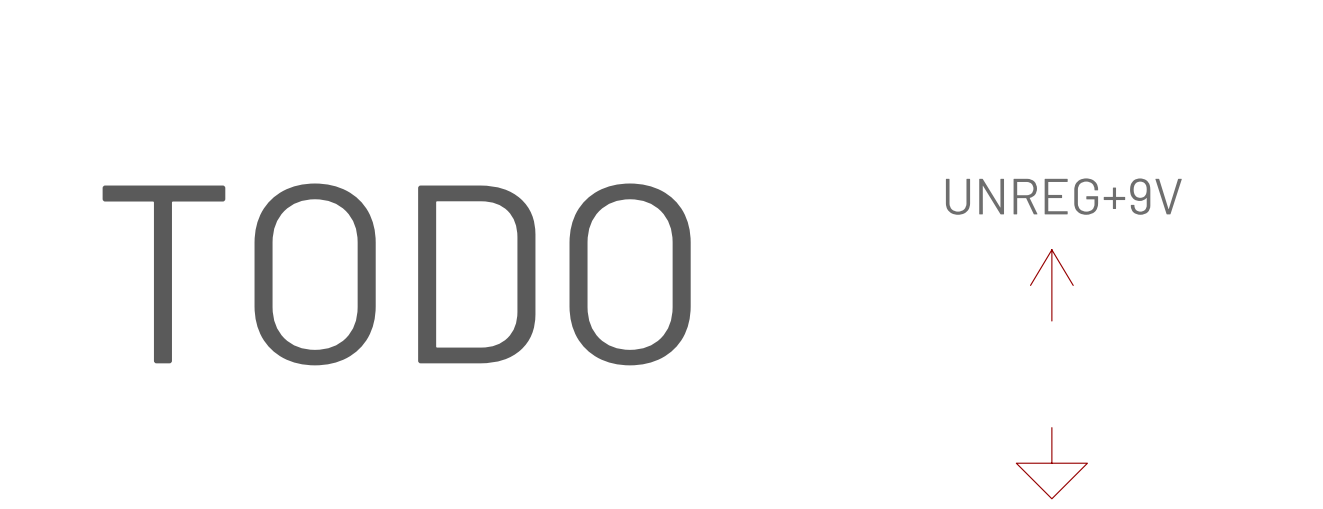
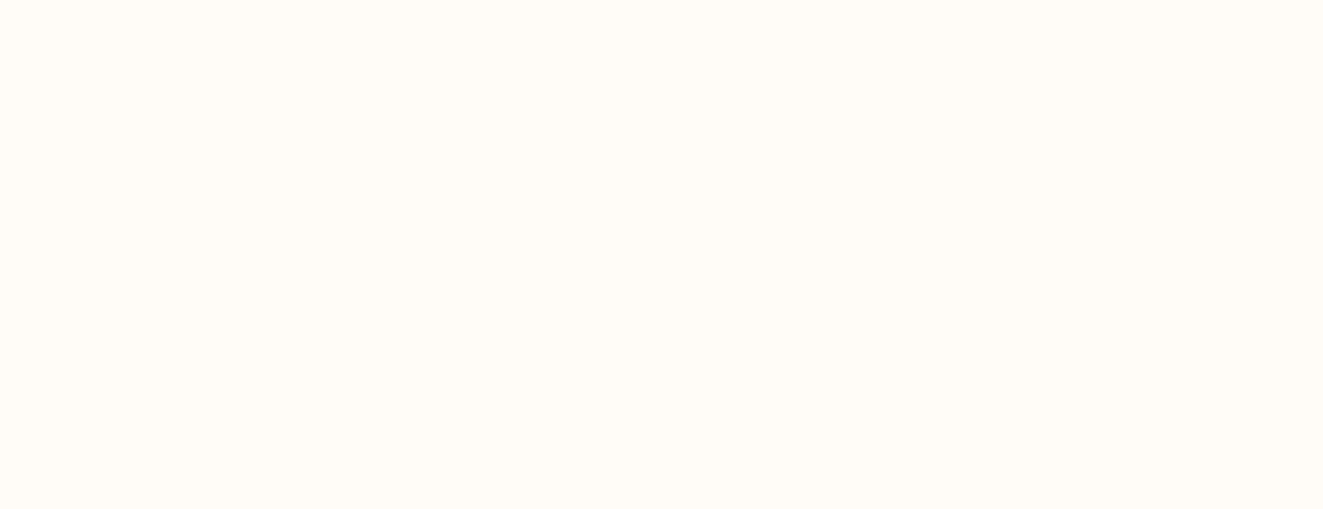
text: TODO (396, 274) -> none
power symbol: UNREG+9V (1051, 285) -> none
power symbol: (1051, 463) -> none

